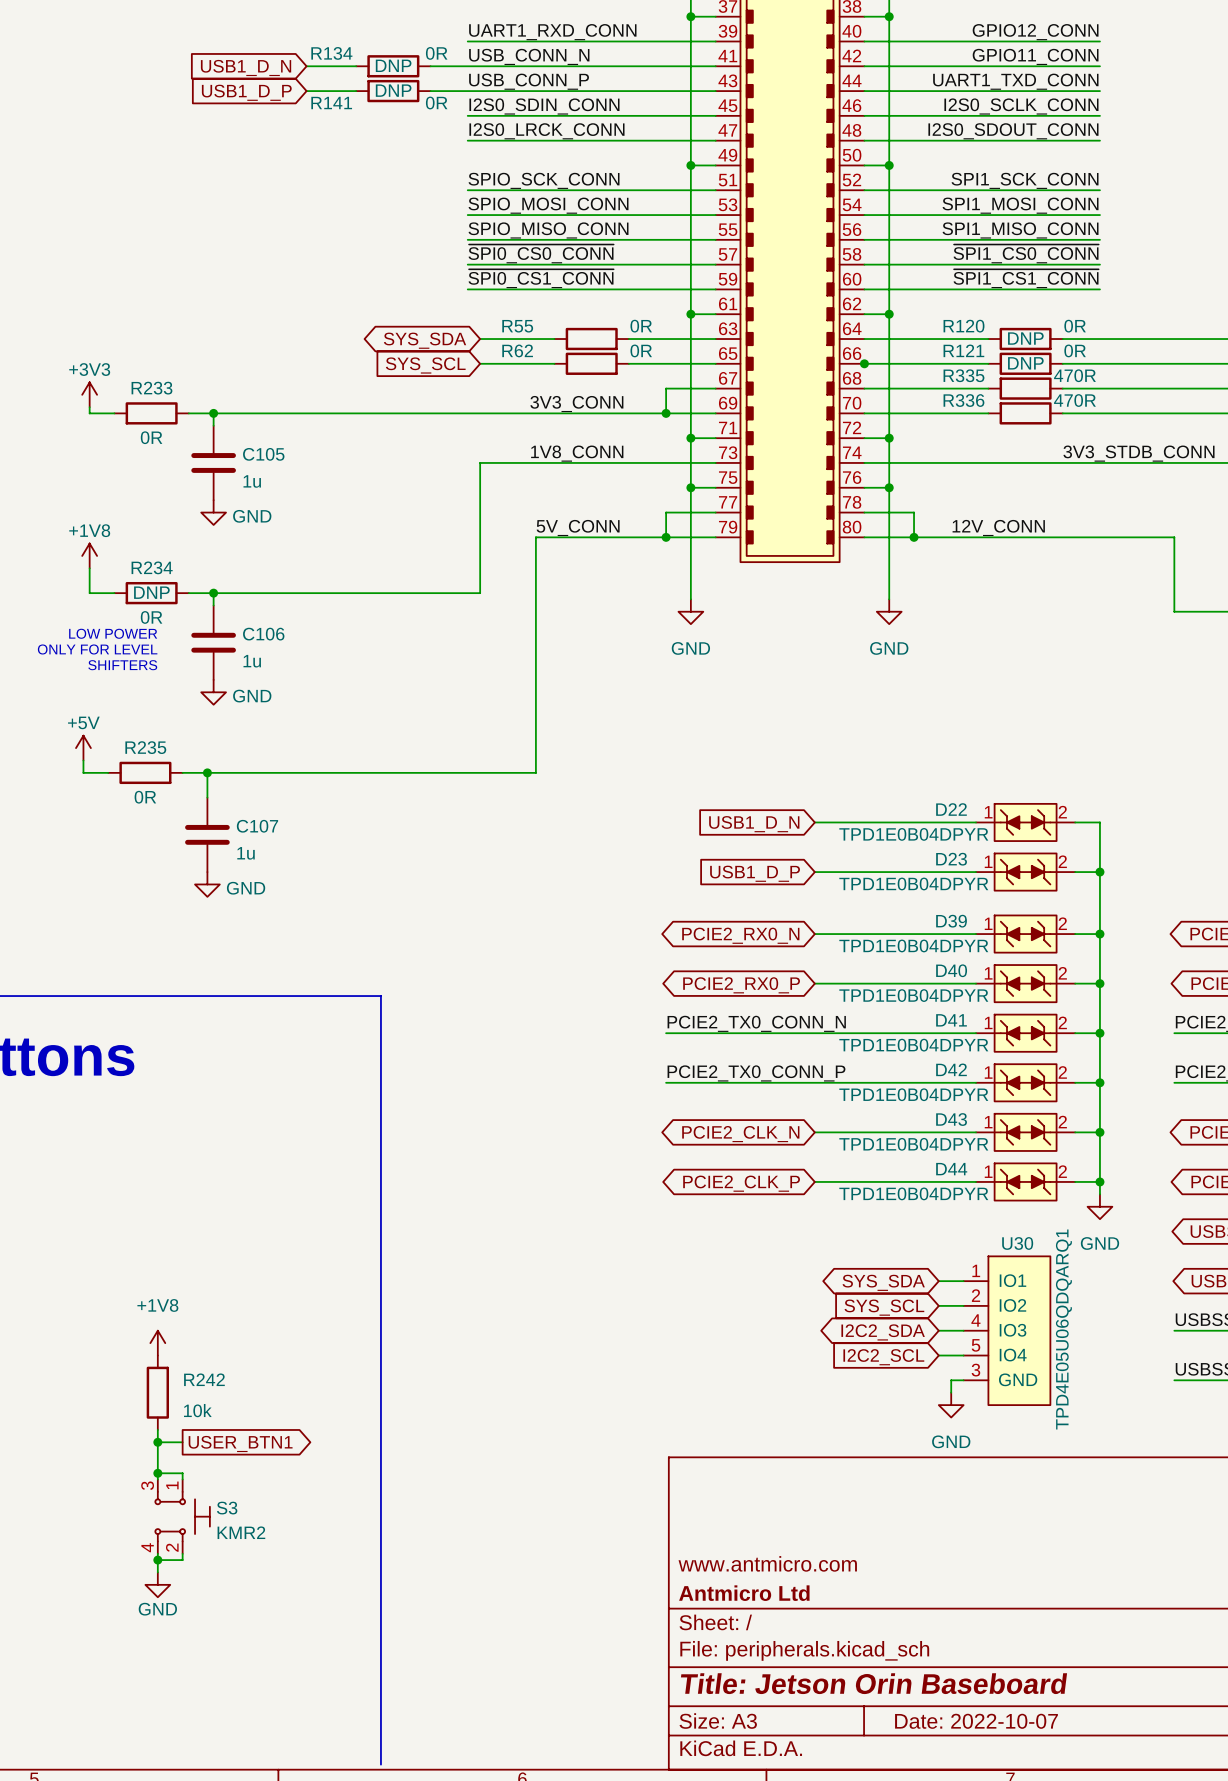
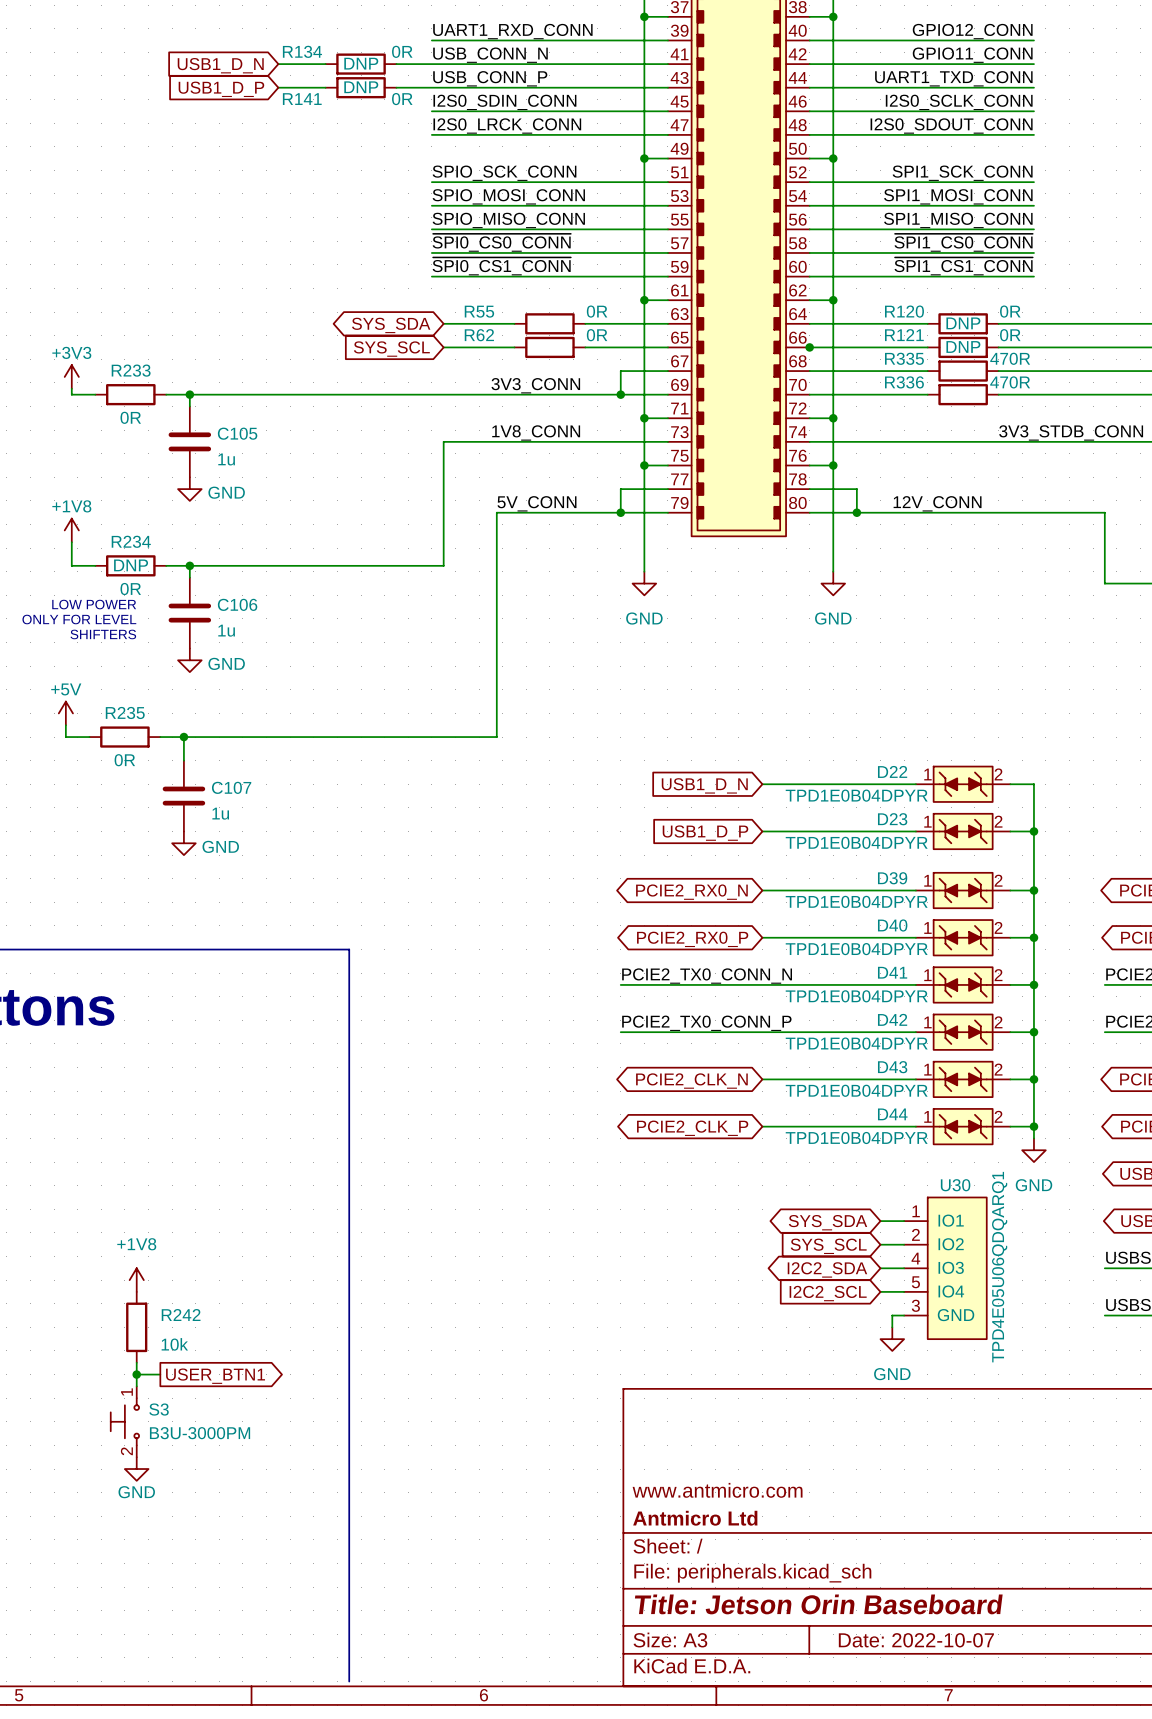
wire: (157, 1473) (182, 1473) (182, 1479) -> none
junction: (157, 1473) -> none
S3 symbol: [155, 1479, 210, 1554] -> [110, 1386, 140, 1458]
S3 value: KMR2 (241, 1532) -> B3U-3000PM (200, 1433)
wire: (157, 1553) (157, 1572) -> none
wire: (182, 1553) (182, 1560) (157, 1560) -> none
junction: (157, 1560) -> none
power symbol position: GND (157, 1584) -> GND (136, 1469)

